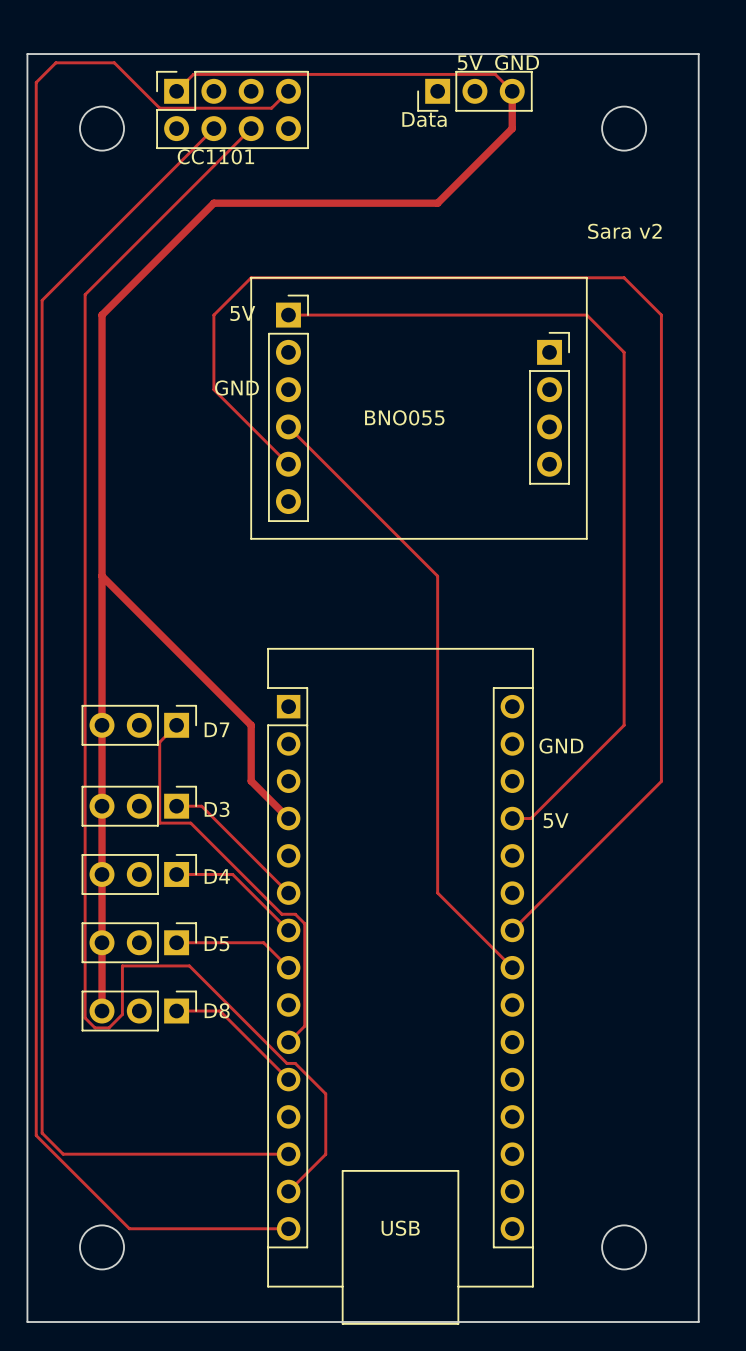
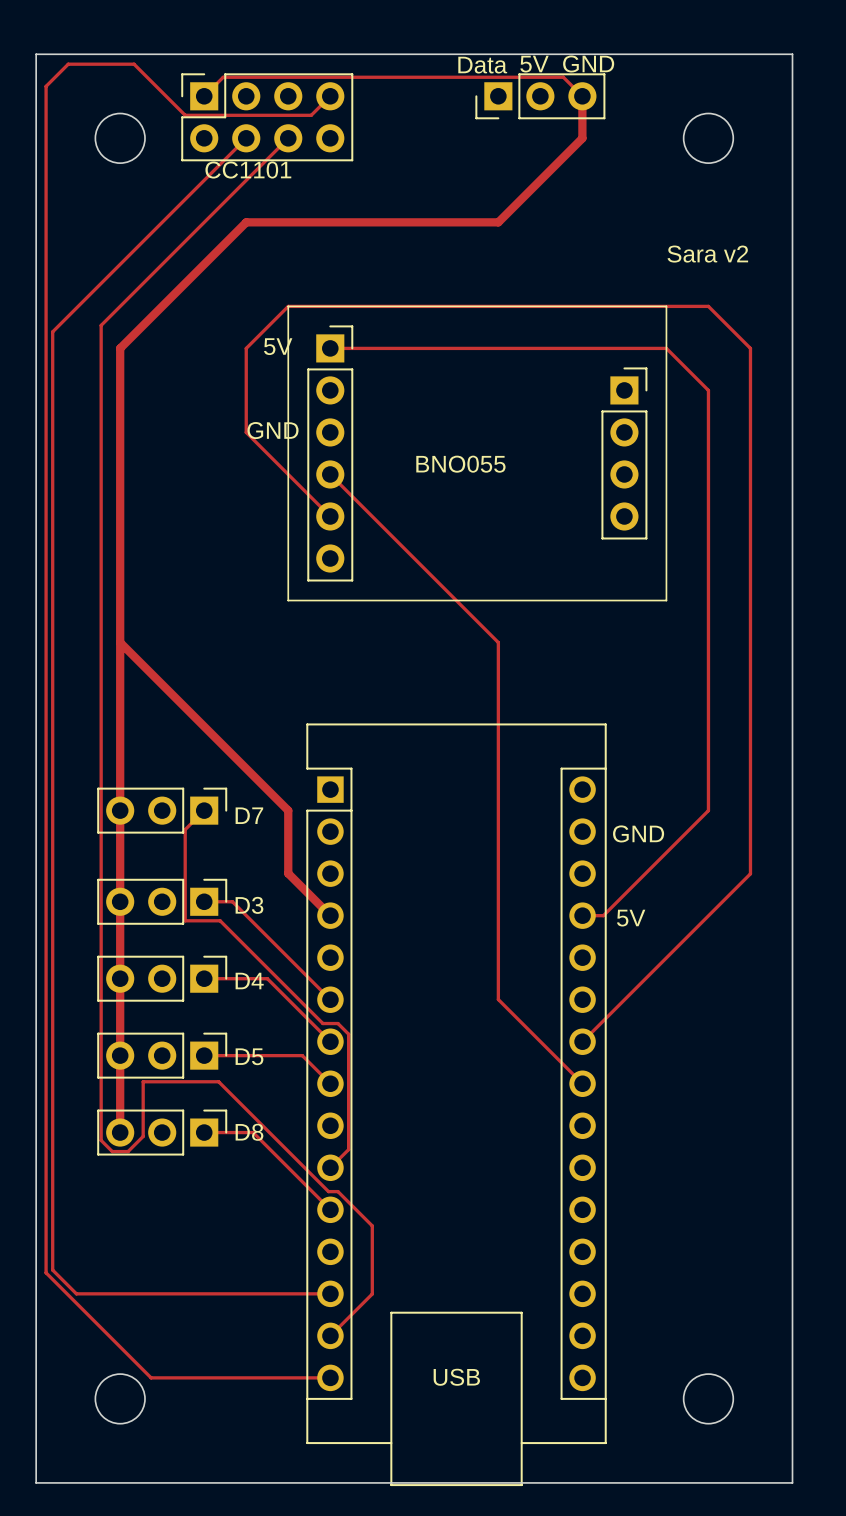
text position: Data (424, 119) -> Data (482, 65)

